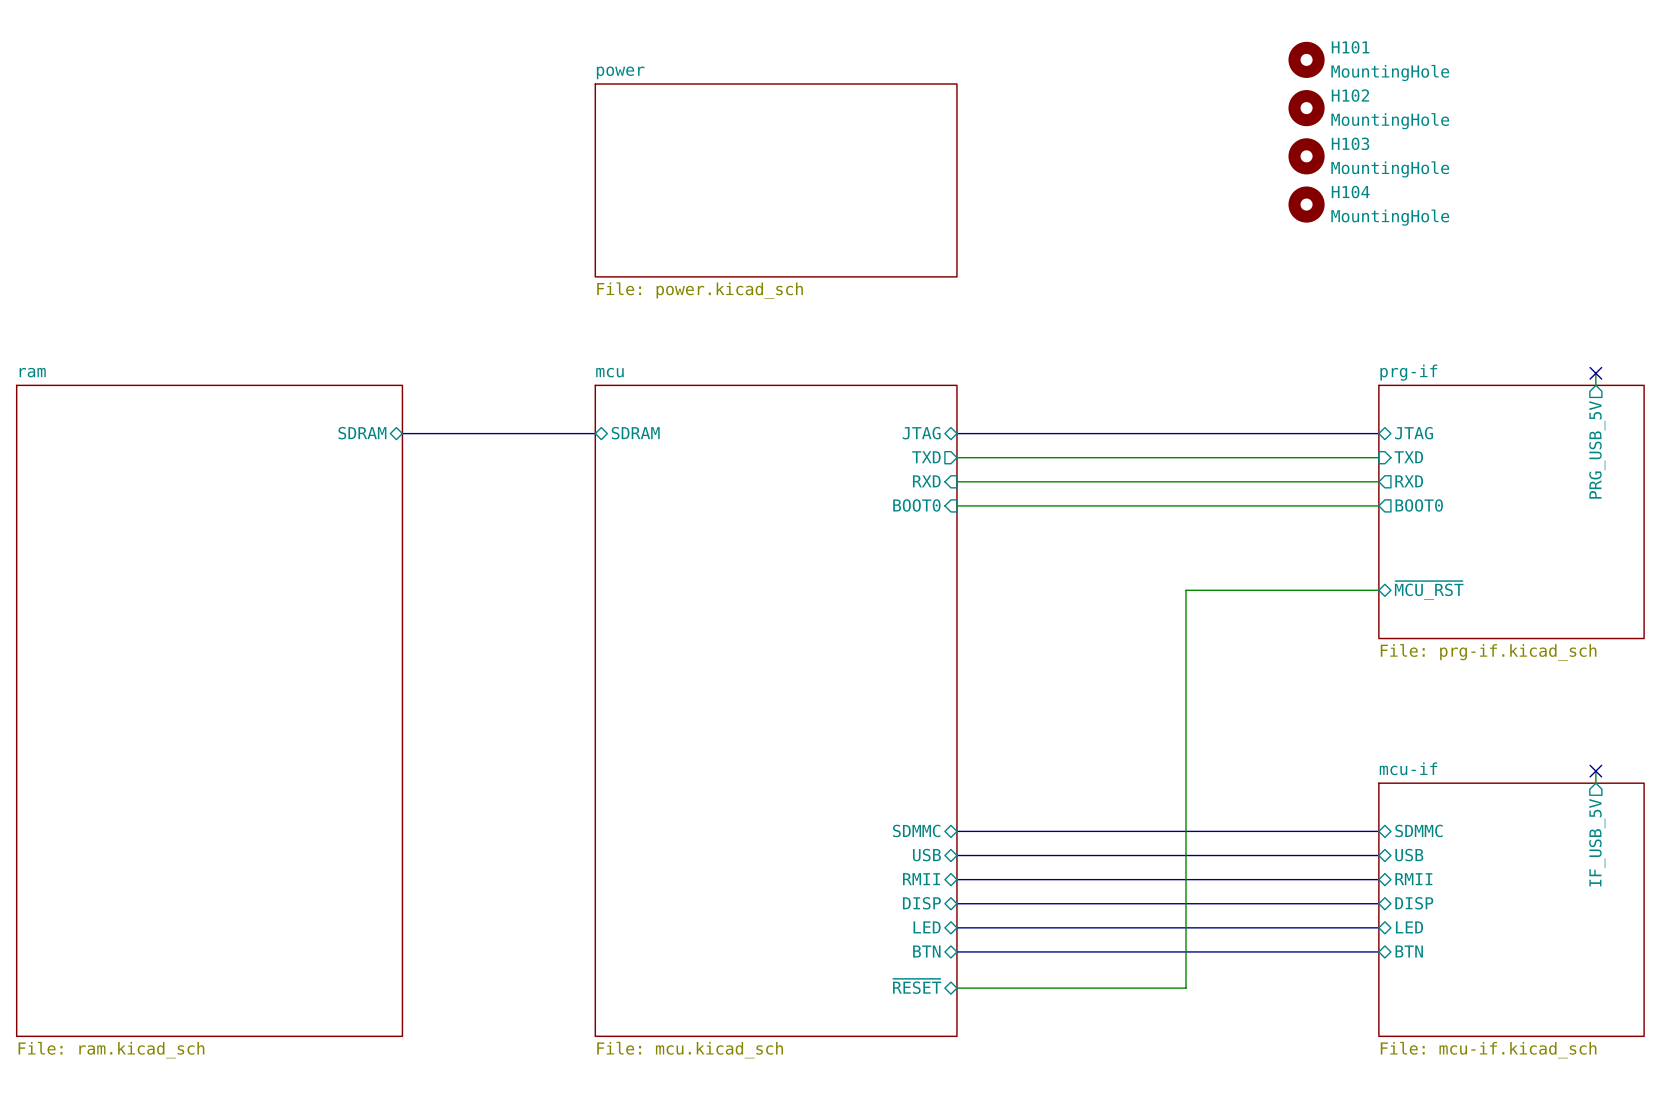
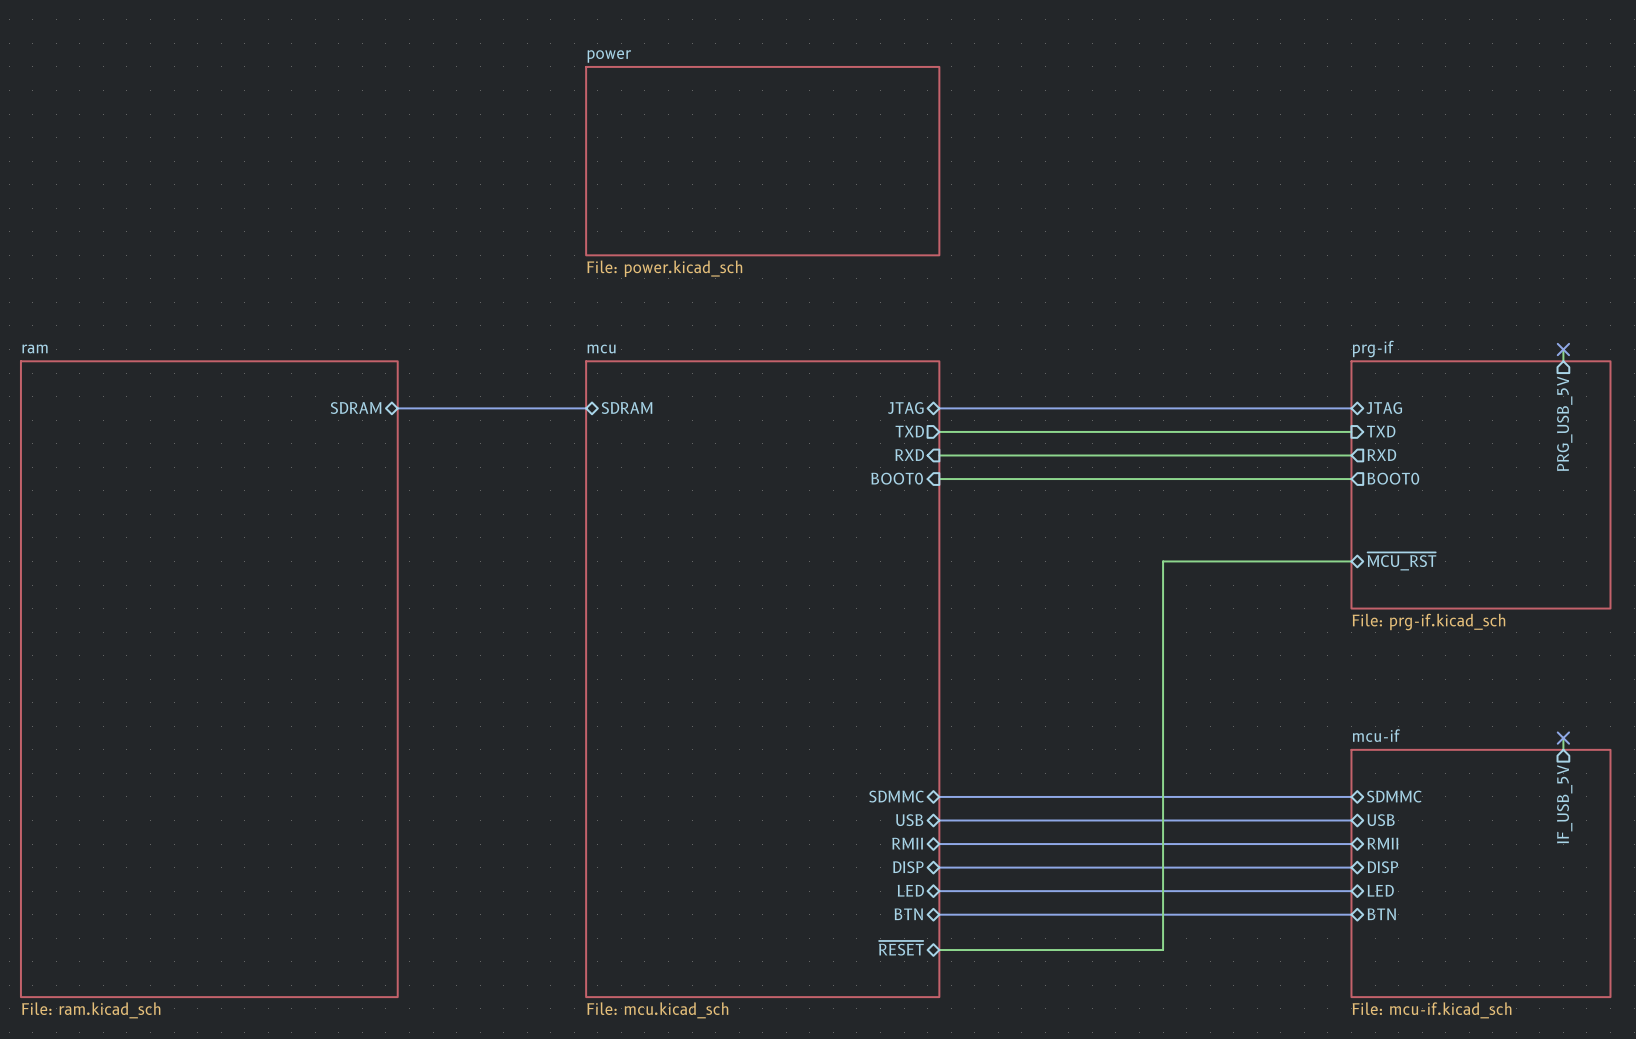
H101: MountingHole (1306, 59) -> none
H102: MountingHole (1306, 108) -> none
H103: MountingHole (1306, 156) -> none
H104: MountingHole (1306, 204) -> none

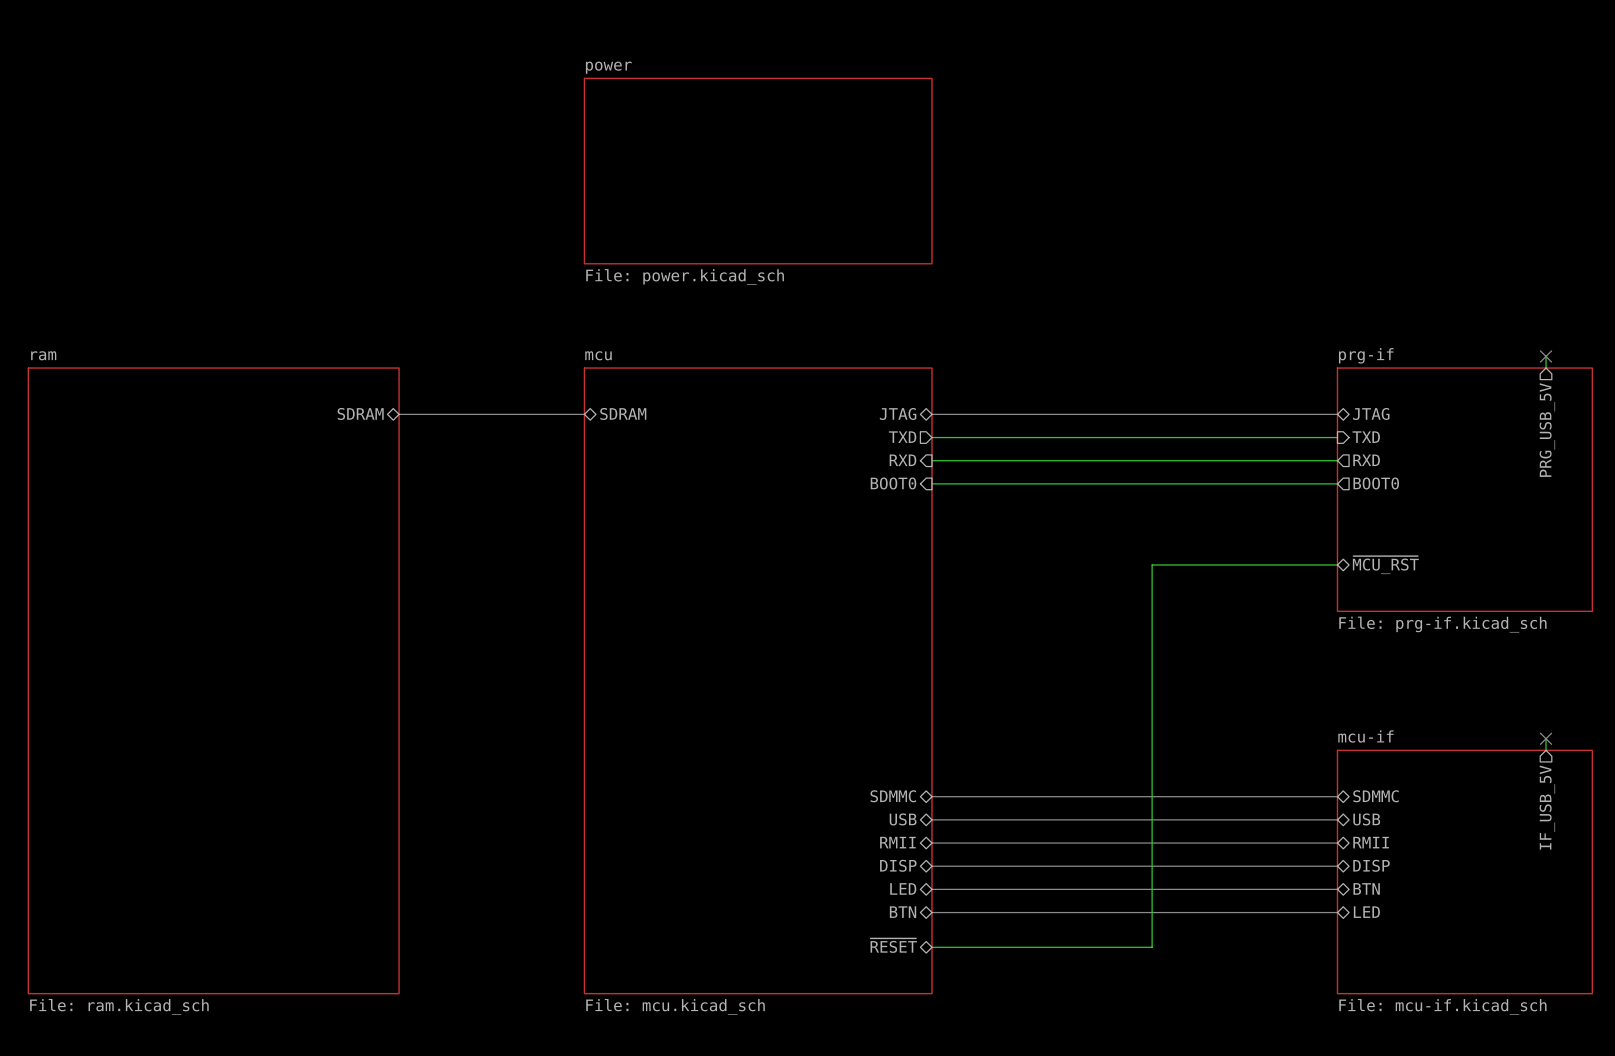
sheet pin: LED (1380, 890) -> BTN (1366, 888)
sheet pin: BTN (1381, 914) -> LED (1366, 912)

